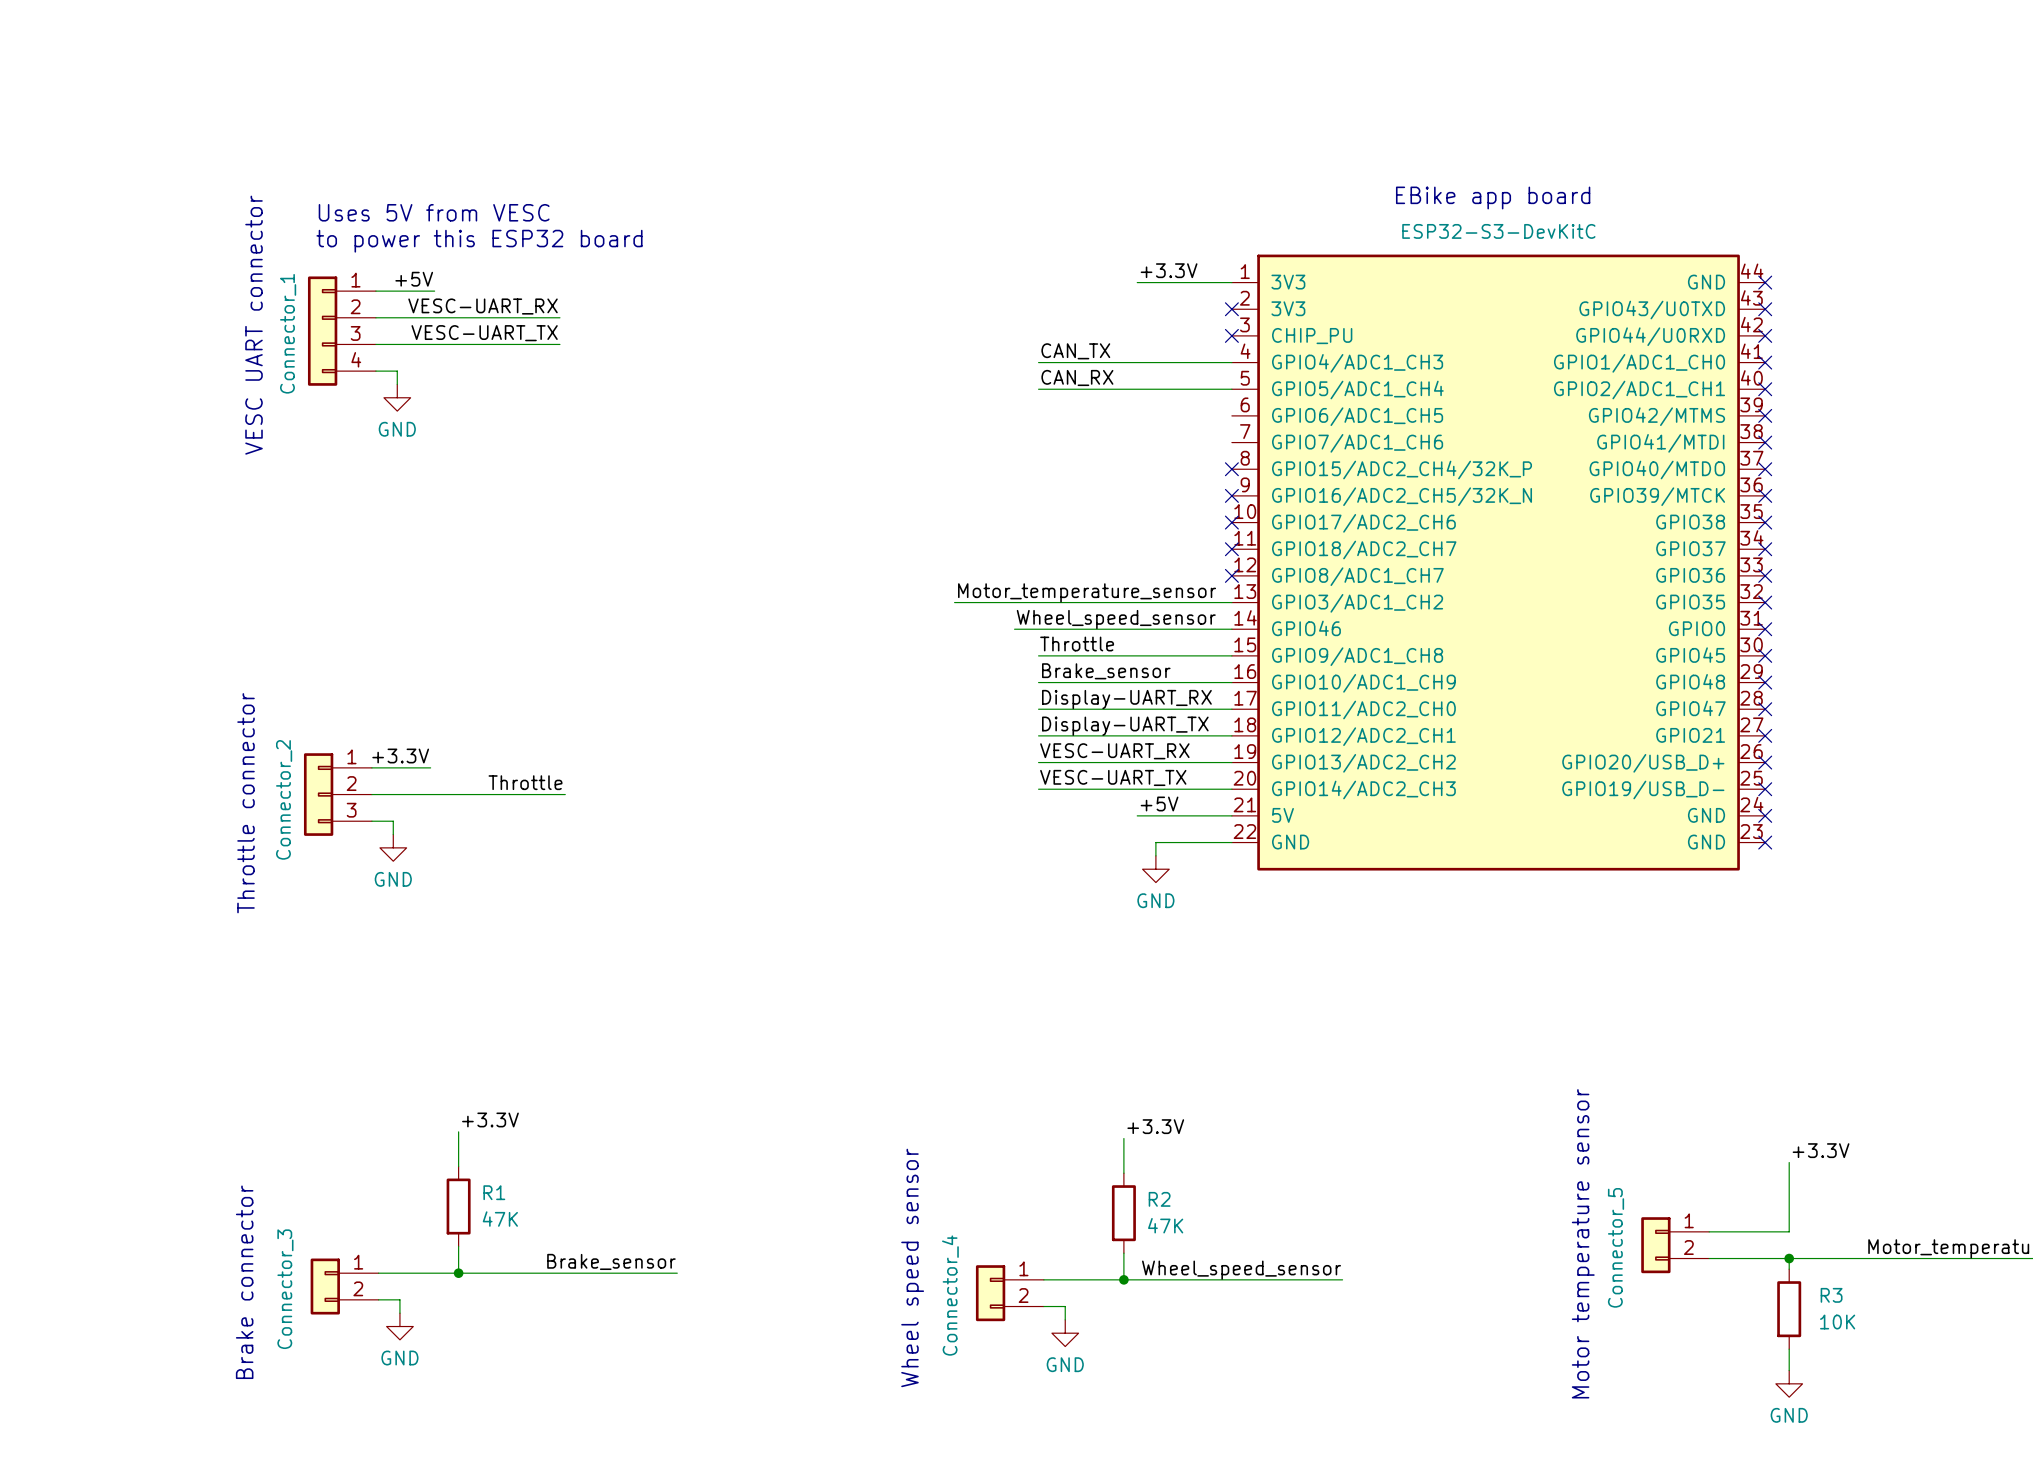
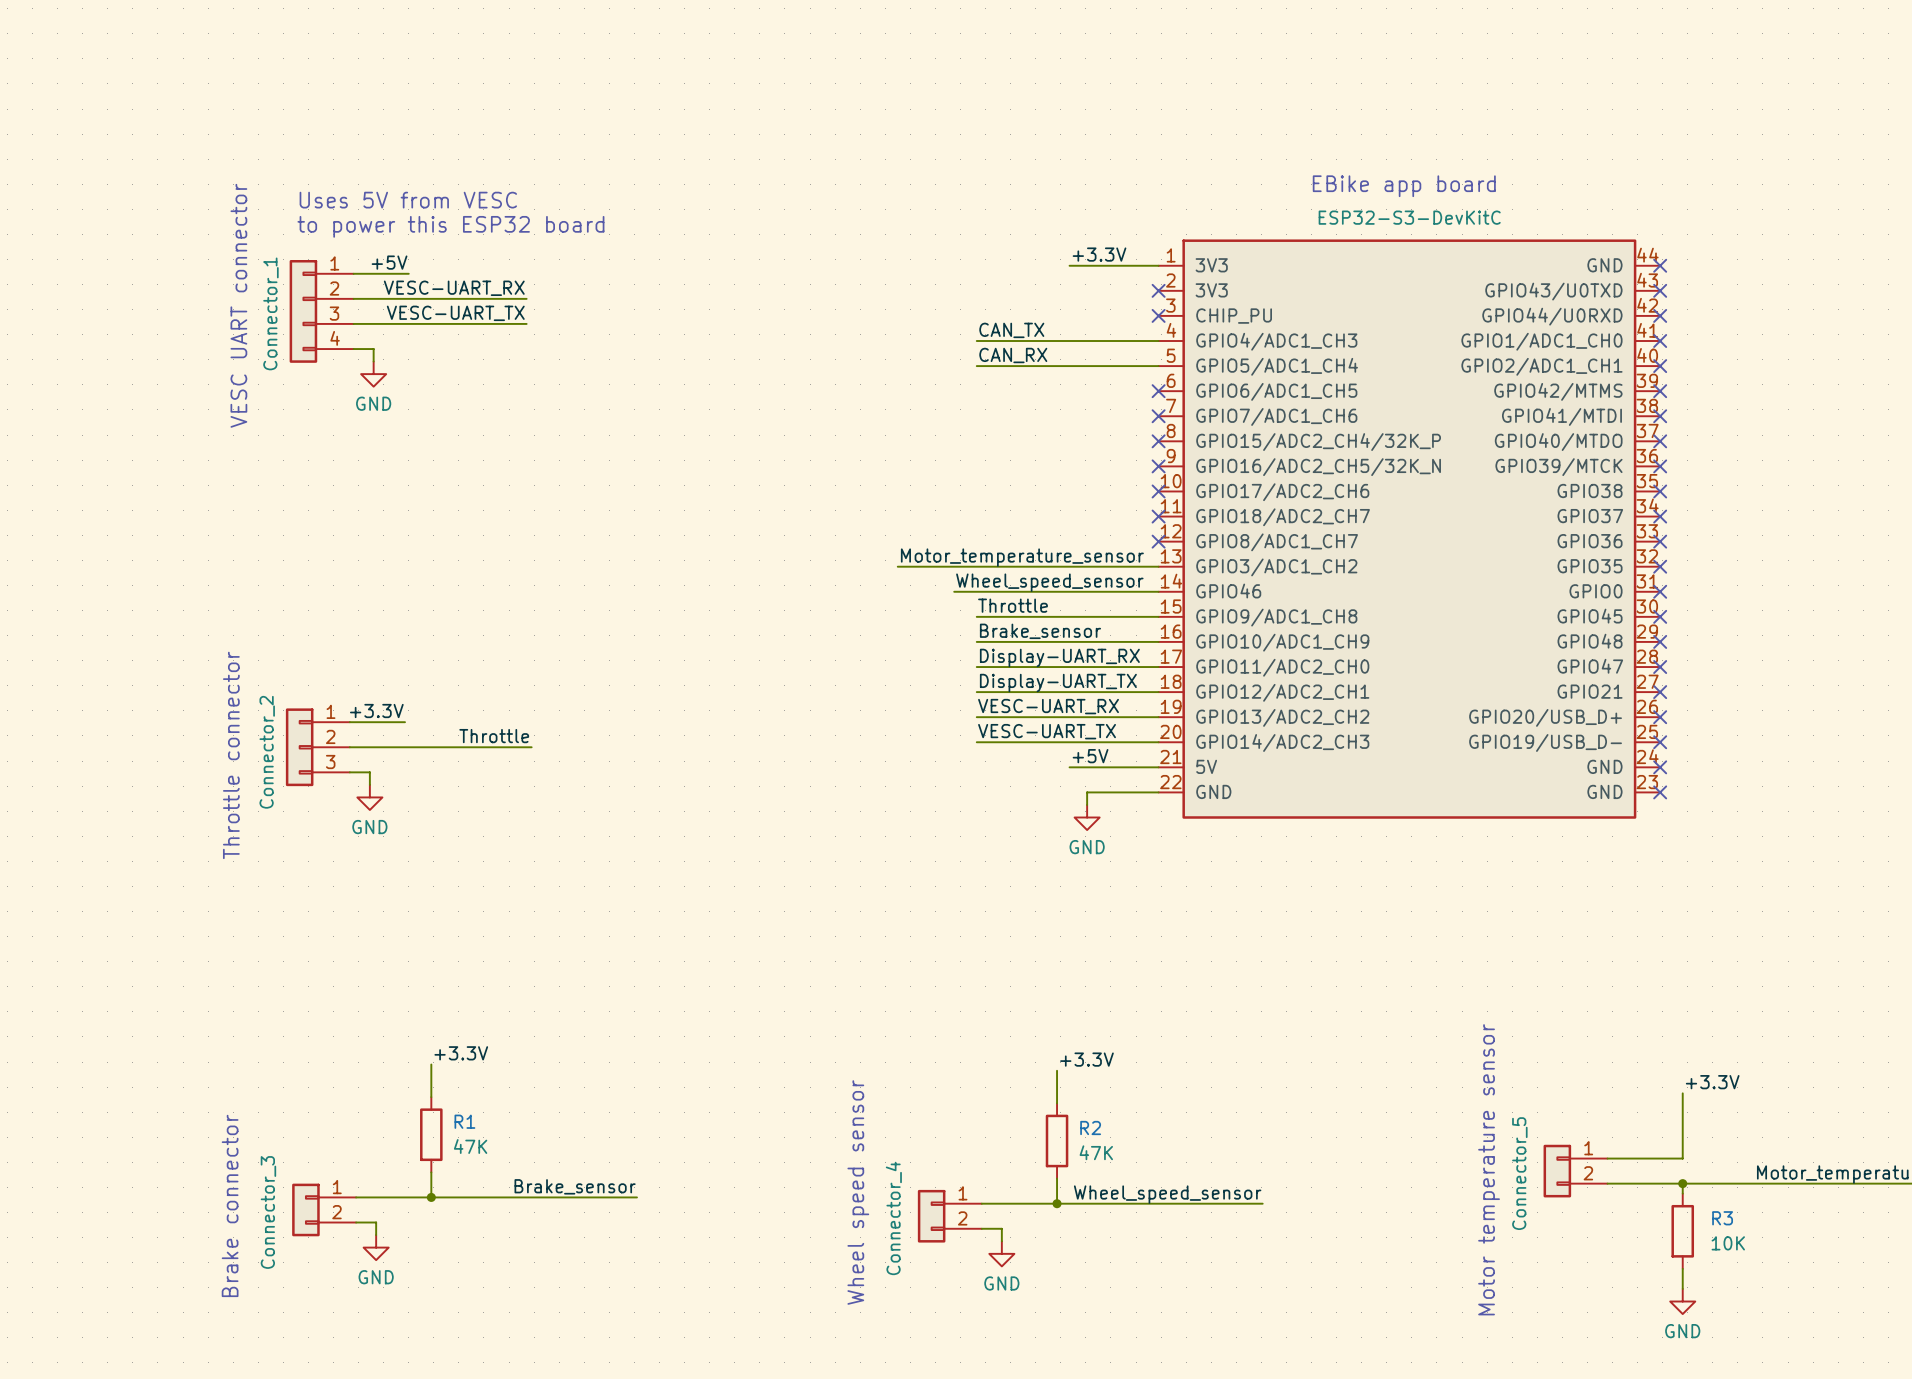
no-connect mark: none -> (1158, 391)
no-connect mark: none -> (1158, 416)

